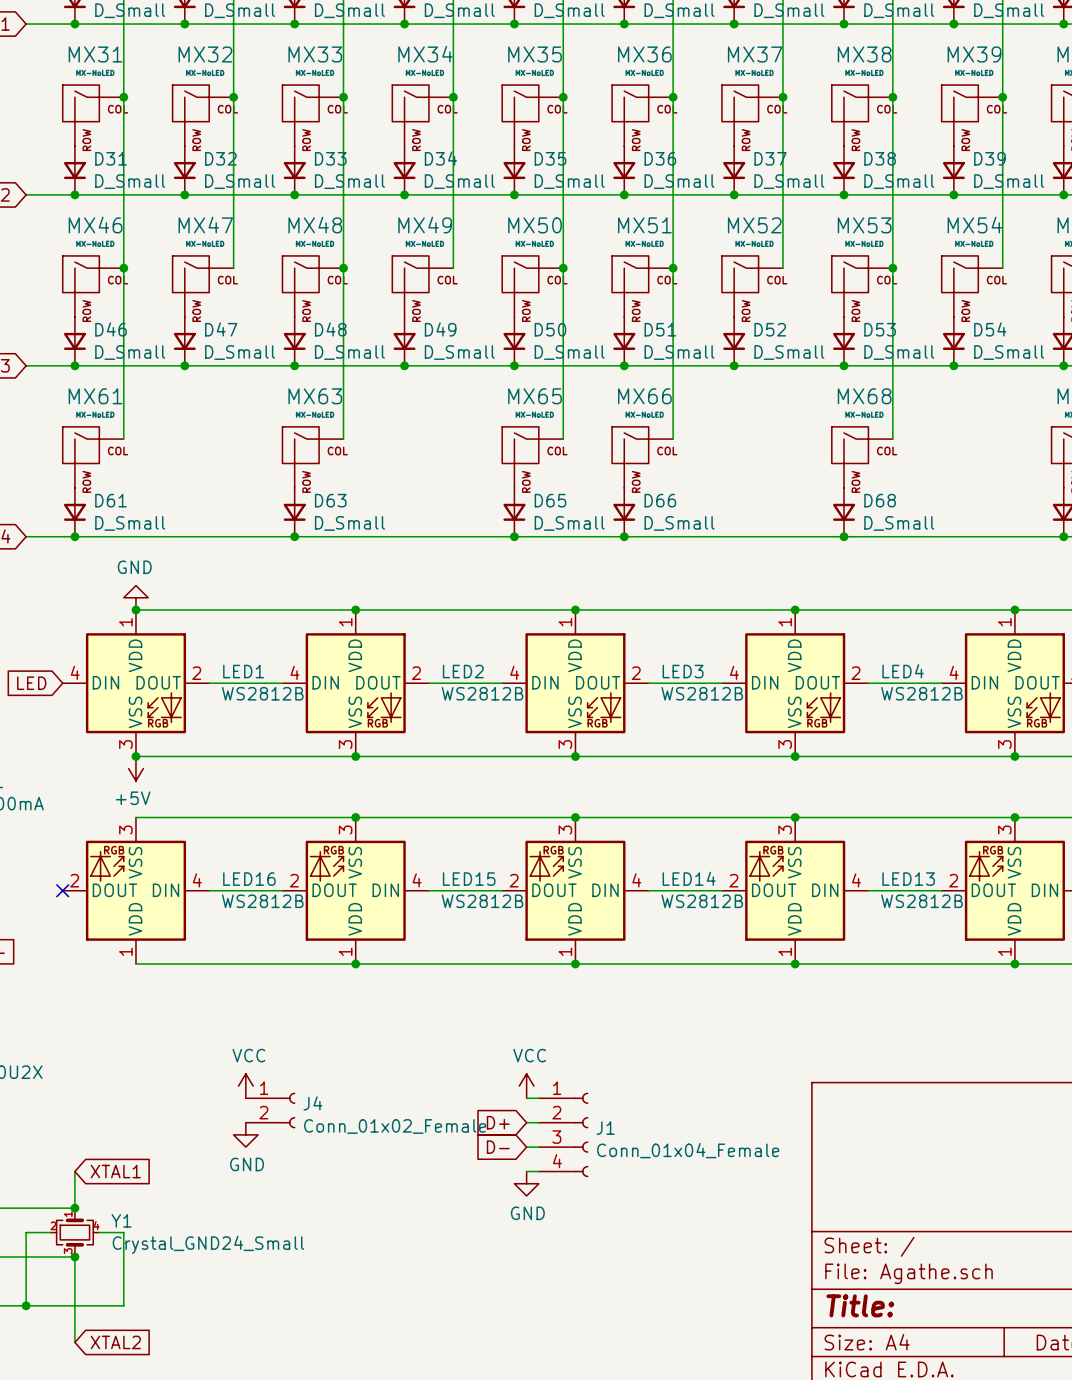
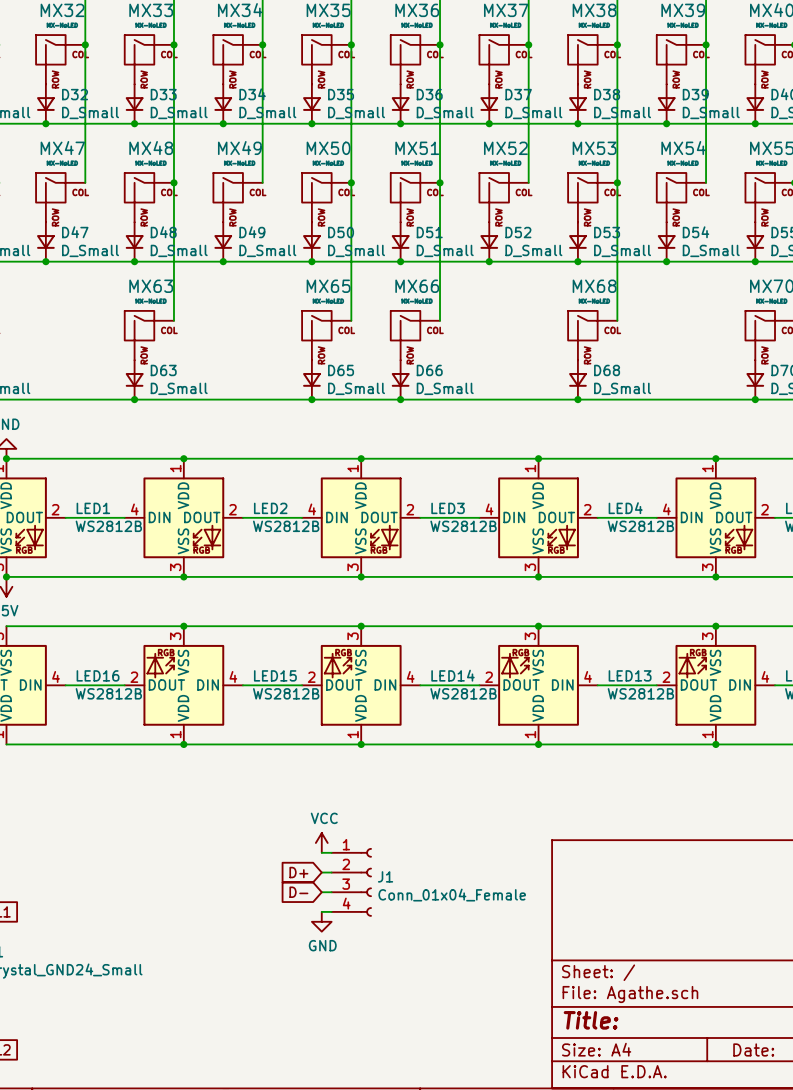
power symbol: VCC (245, 1086) -> none
J4: Conn_01x02_Female (270, 1110) -> none
power symbol: GND (245, 1134) -> none

